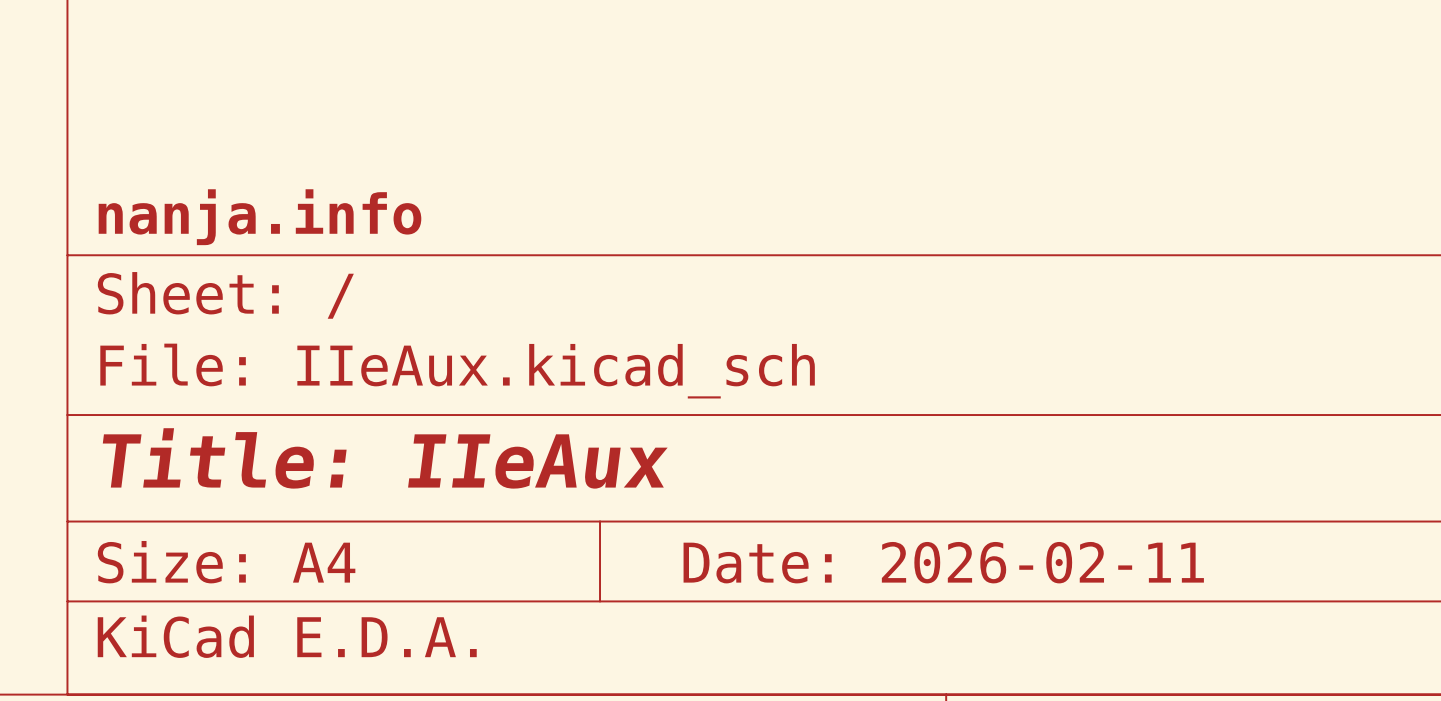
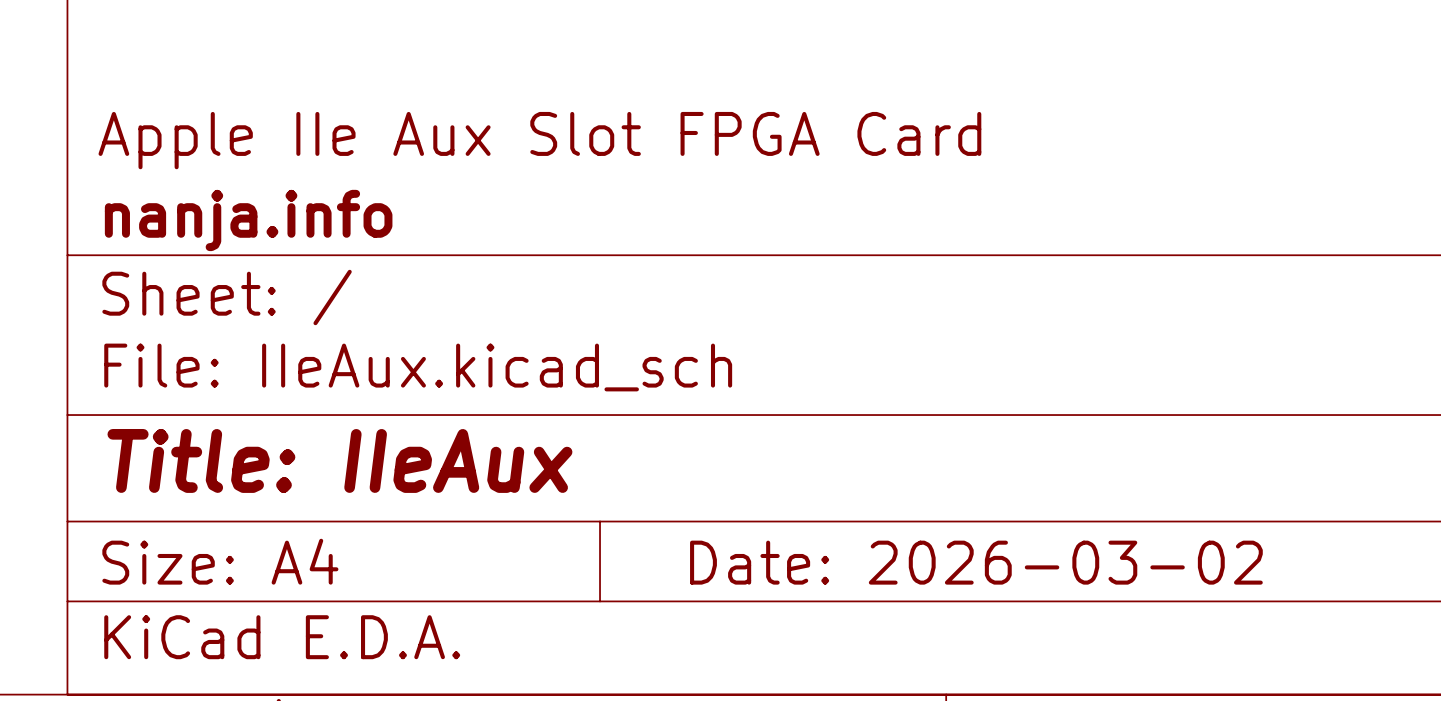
title block: none -> Apple IIe Aux Slot FPGA Card (539, 140)
title block: Date: 2026-02-11 (943, 562) -> Date: 2026-03-02 (976, 562)

